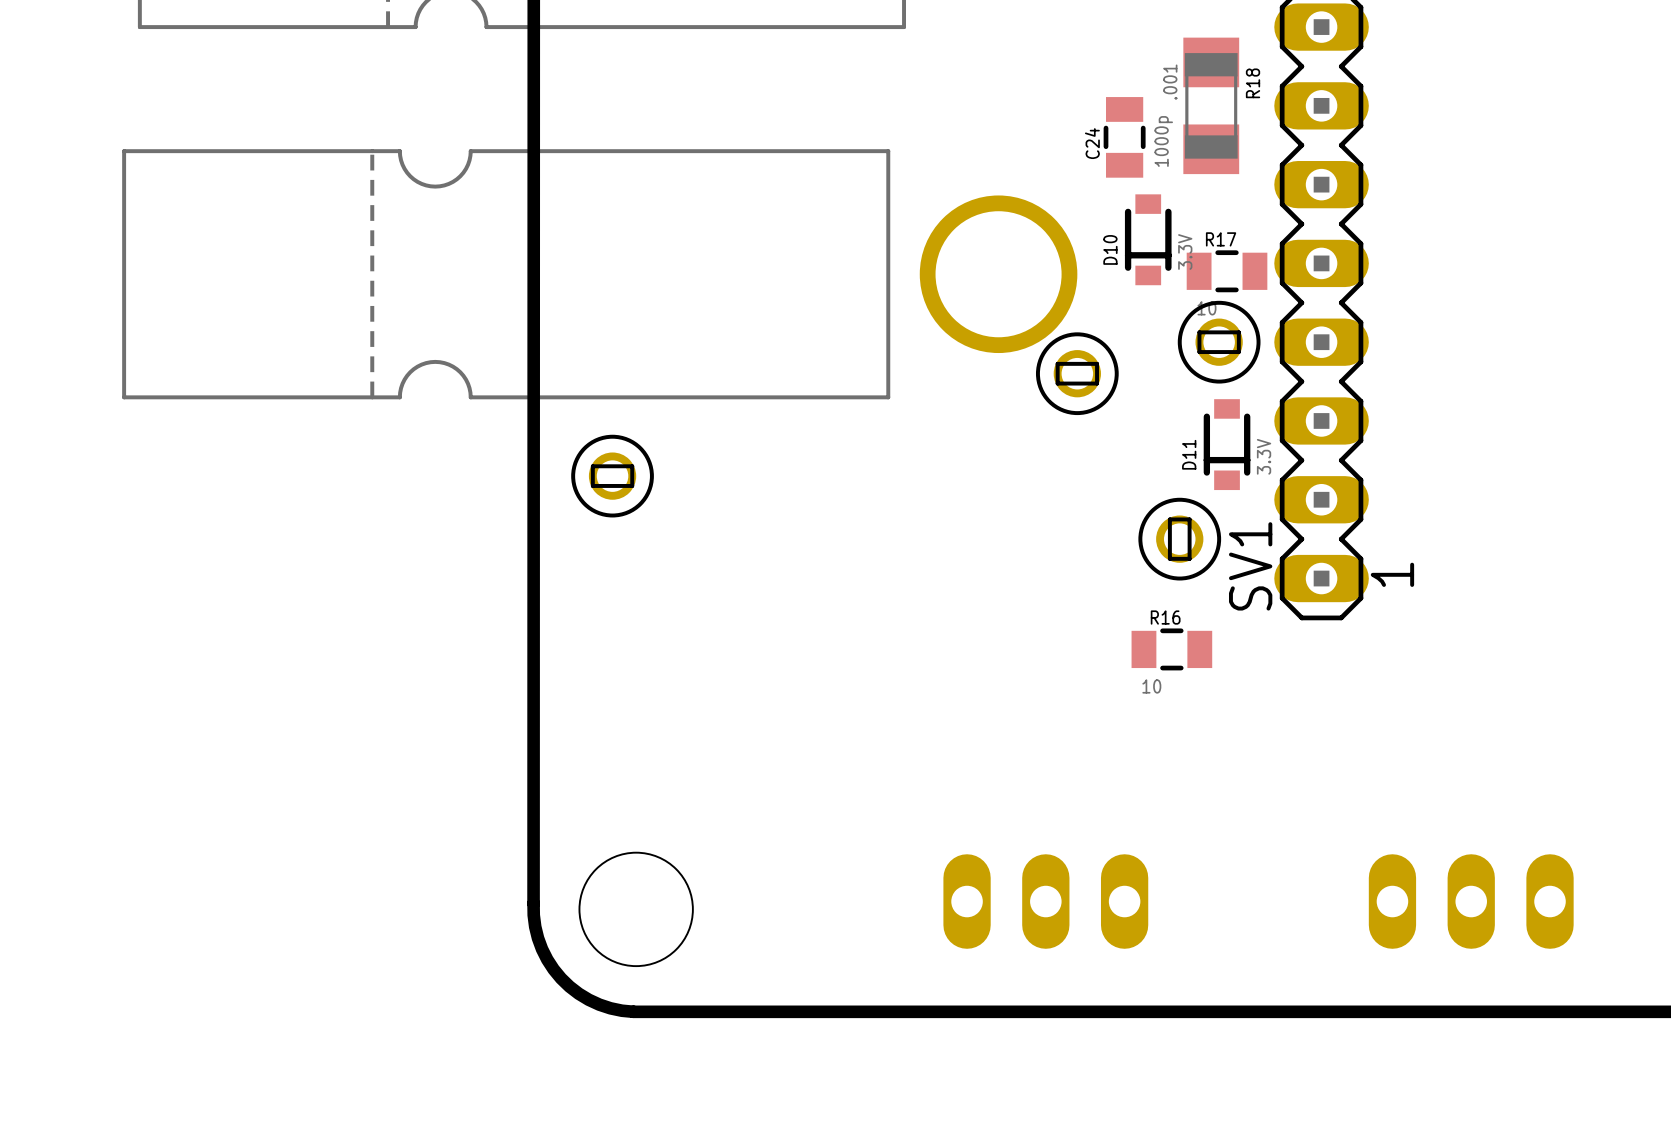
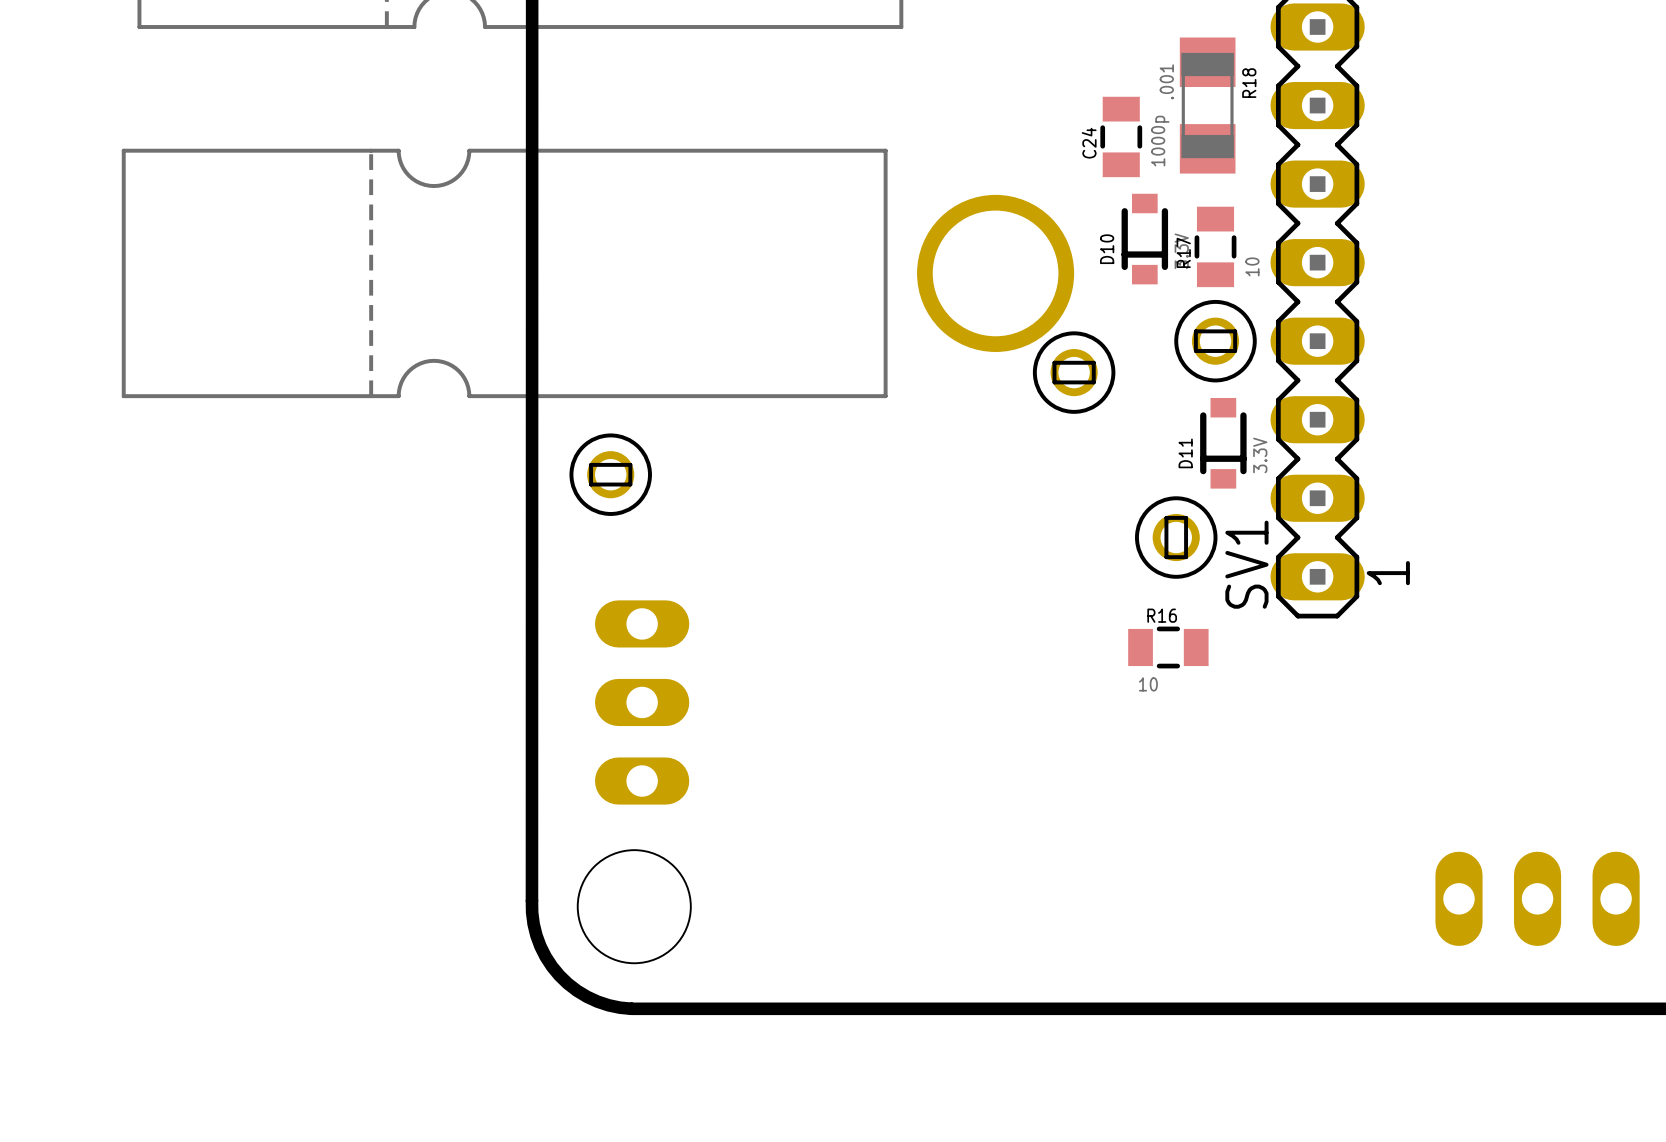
R17 rotation: 0° (1227, 271) -> 90° clockwise (1215, 246)
part: none -> (642, 702)
part: (1045, 901) -> none
part position: (1471, 901) -> (1537, 898)

